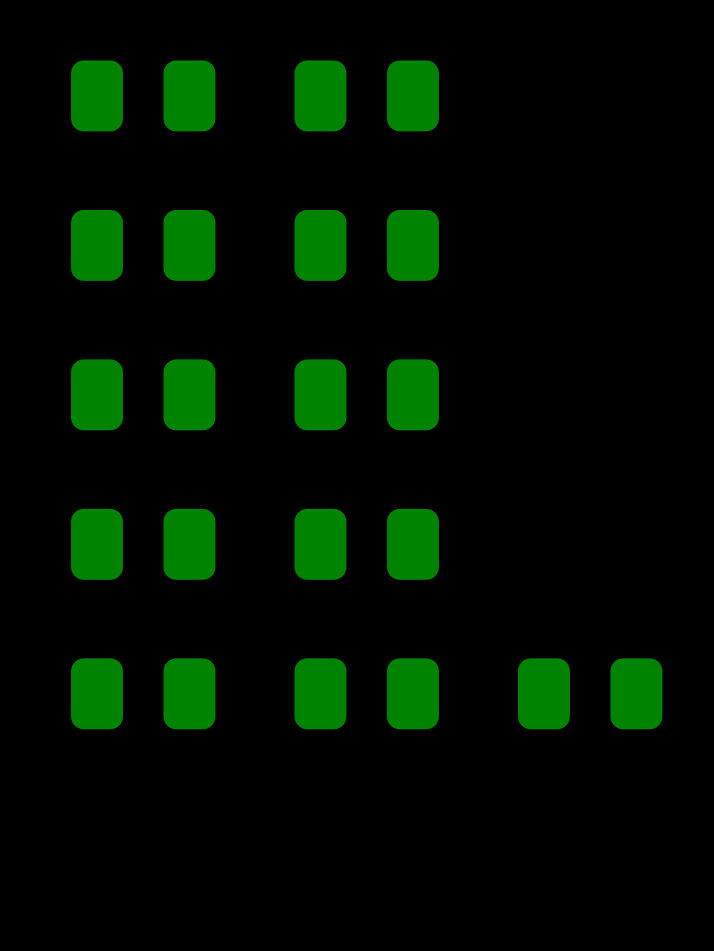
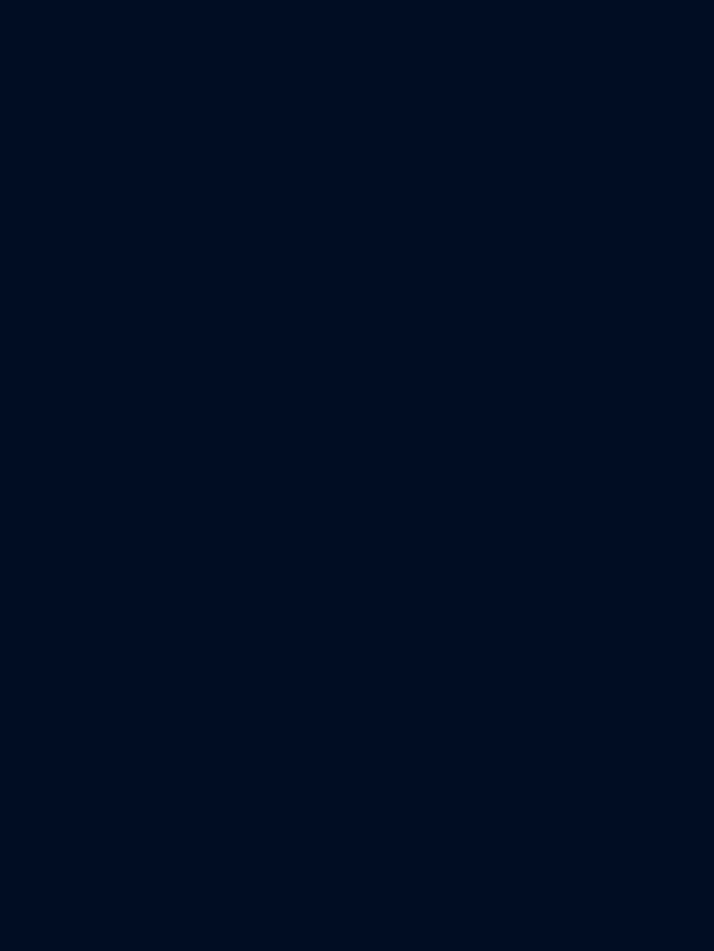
part: (143, 95) -> none
part: (366, 95) -> none
part: (143, 245) -> none
part: (366, 245) -> none
part: (143, 394) -> none
part: (366, 394) -> none
part: (143, 544) -> none
part: (366, 544) -> none
part: (143, 693) -> none
part: (366, 693) -> none
part: (590, 693) -> none

